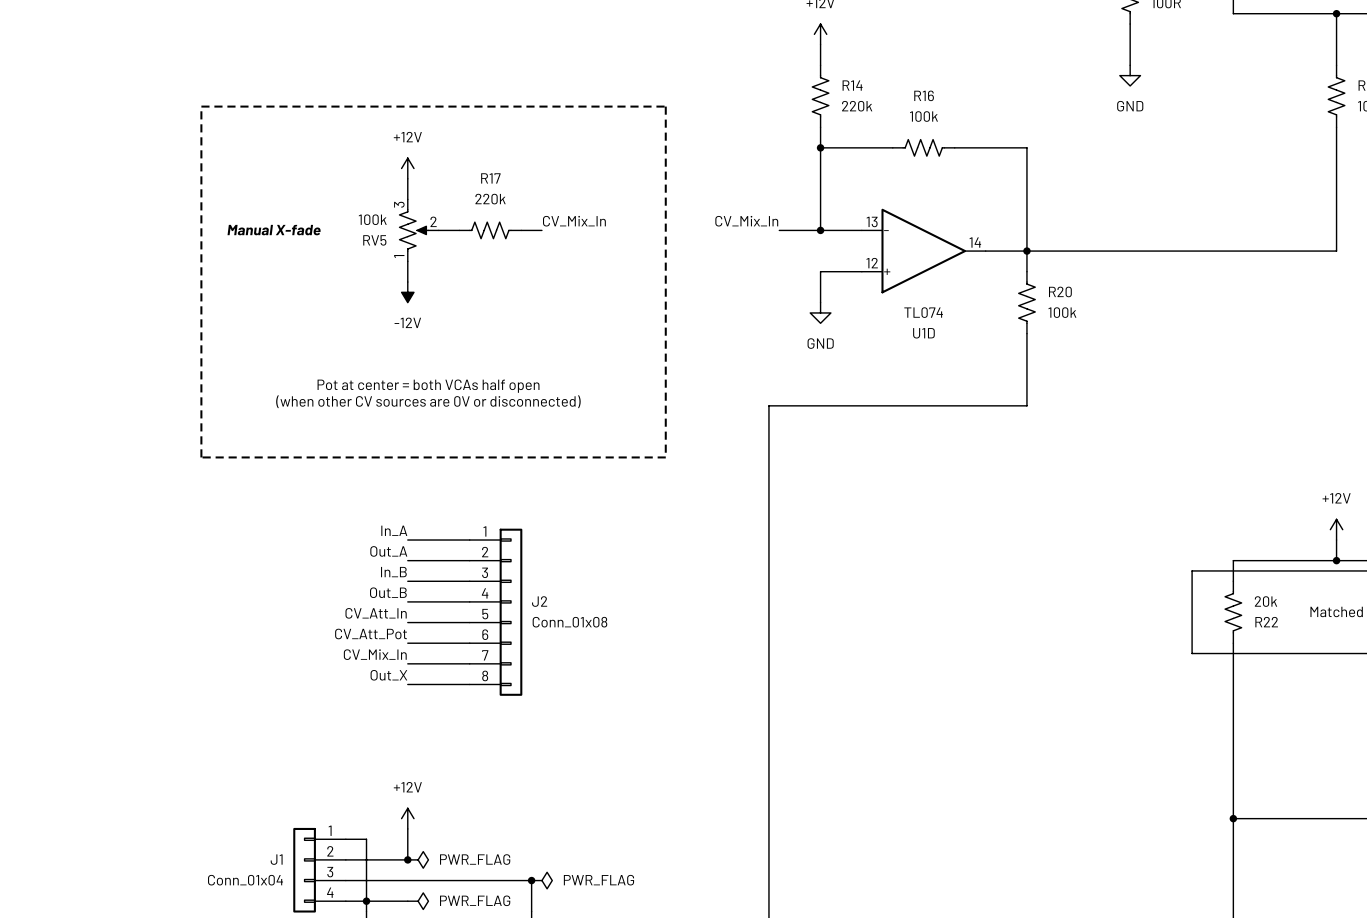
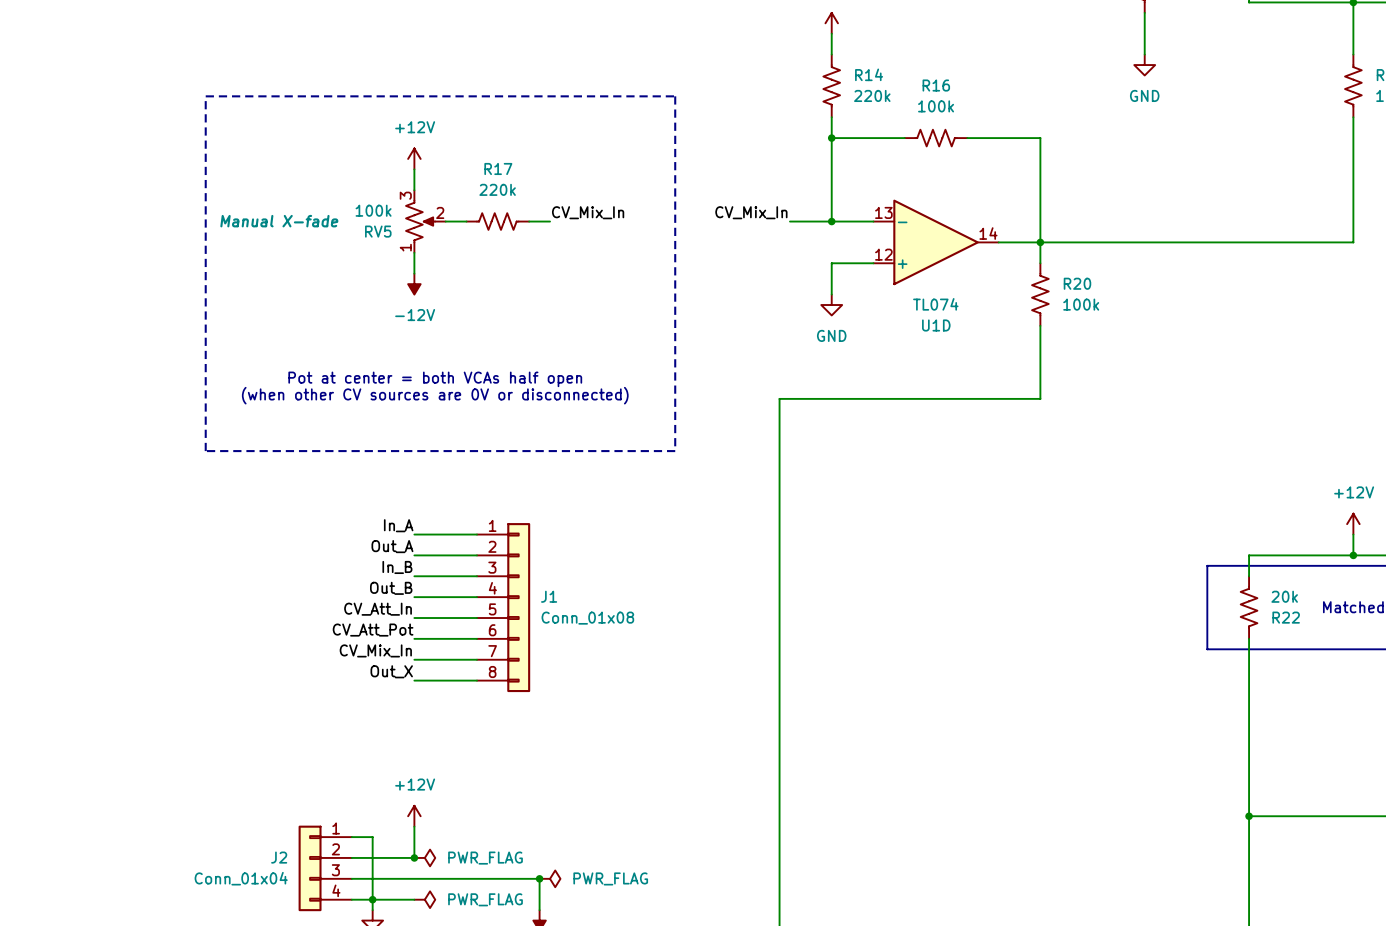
J2 name: J2 (539, 601) -> J1 (549, 596)
J1 name: J1 (276, 859) -> J2 (279, 857)

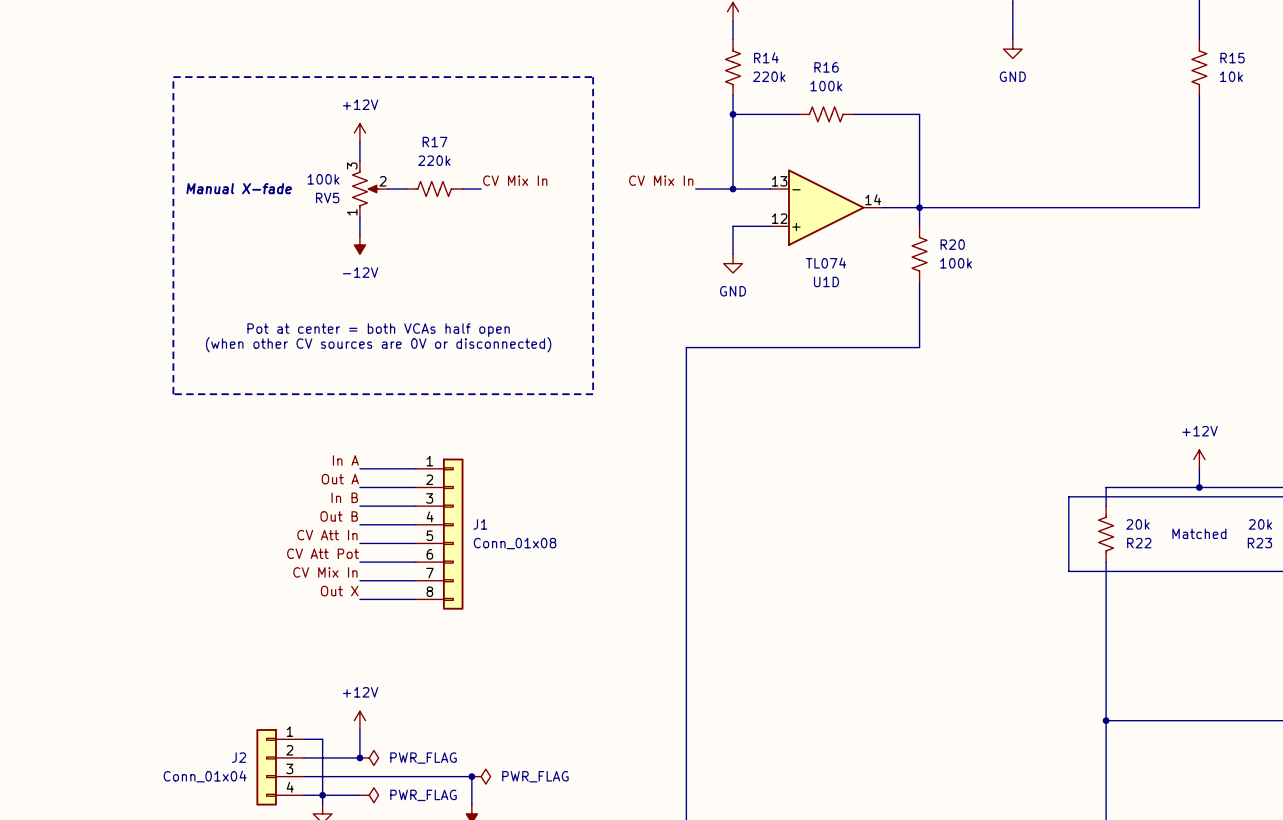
label: CV_Mix_In (588, 212) -> CV Mix In (515, 180)
label: CV_Mix_In (751, 212) -> CV Mix In (661, 180)
label: In_A (398, 525) -> In A (345, 460)
label: Out_A (392, 546) -> Out A (340, 479)
label: In_B (397, 567) -> In B (344, 497)
label: Out_B (391, 588) -> Out B (339, 516)
label: CV_Att_In (378, 609) -> CV Att In (327, 535)
label: CV_Att_Pot (373, 630) -> CV Att Pot (323, 553)
label: CV_Mix_In (375, 650) -> CV Mix In (325, 572)
label: Out_X (391, 671) -> Out X (339, 591)

